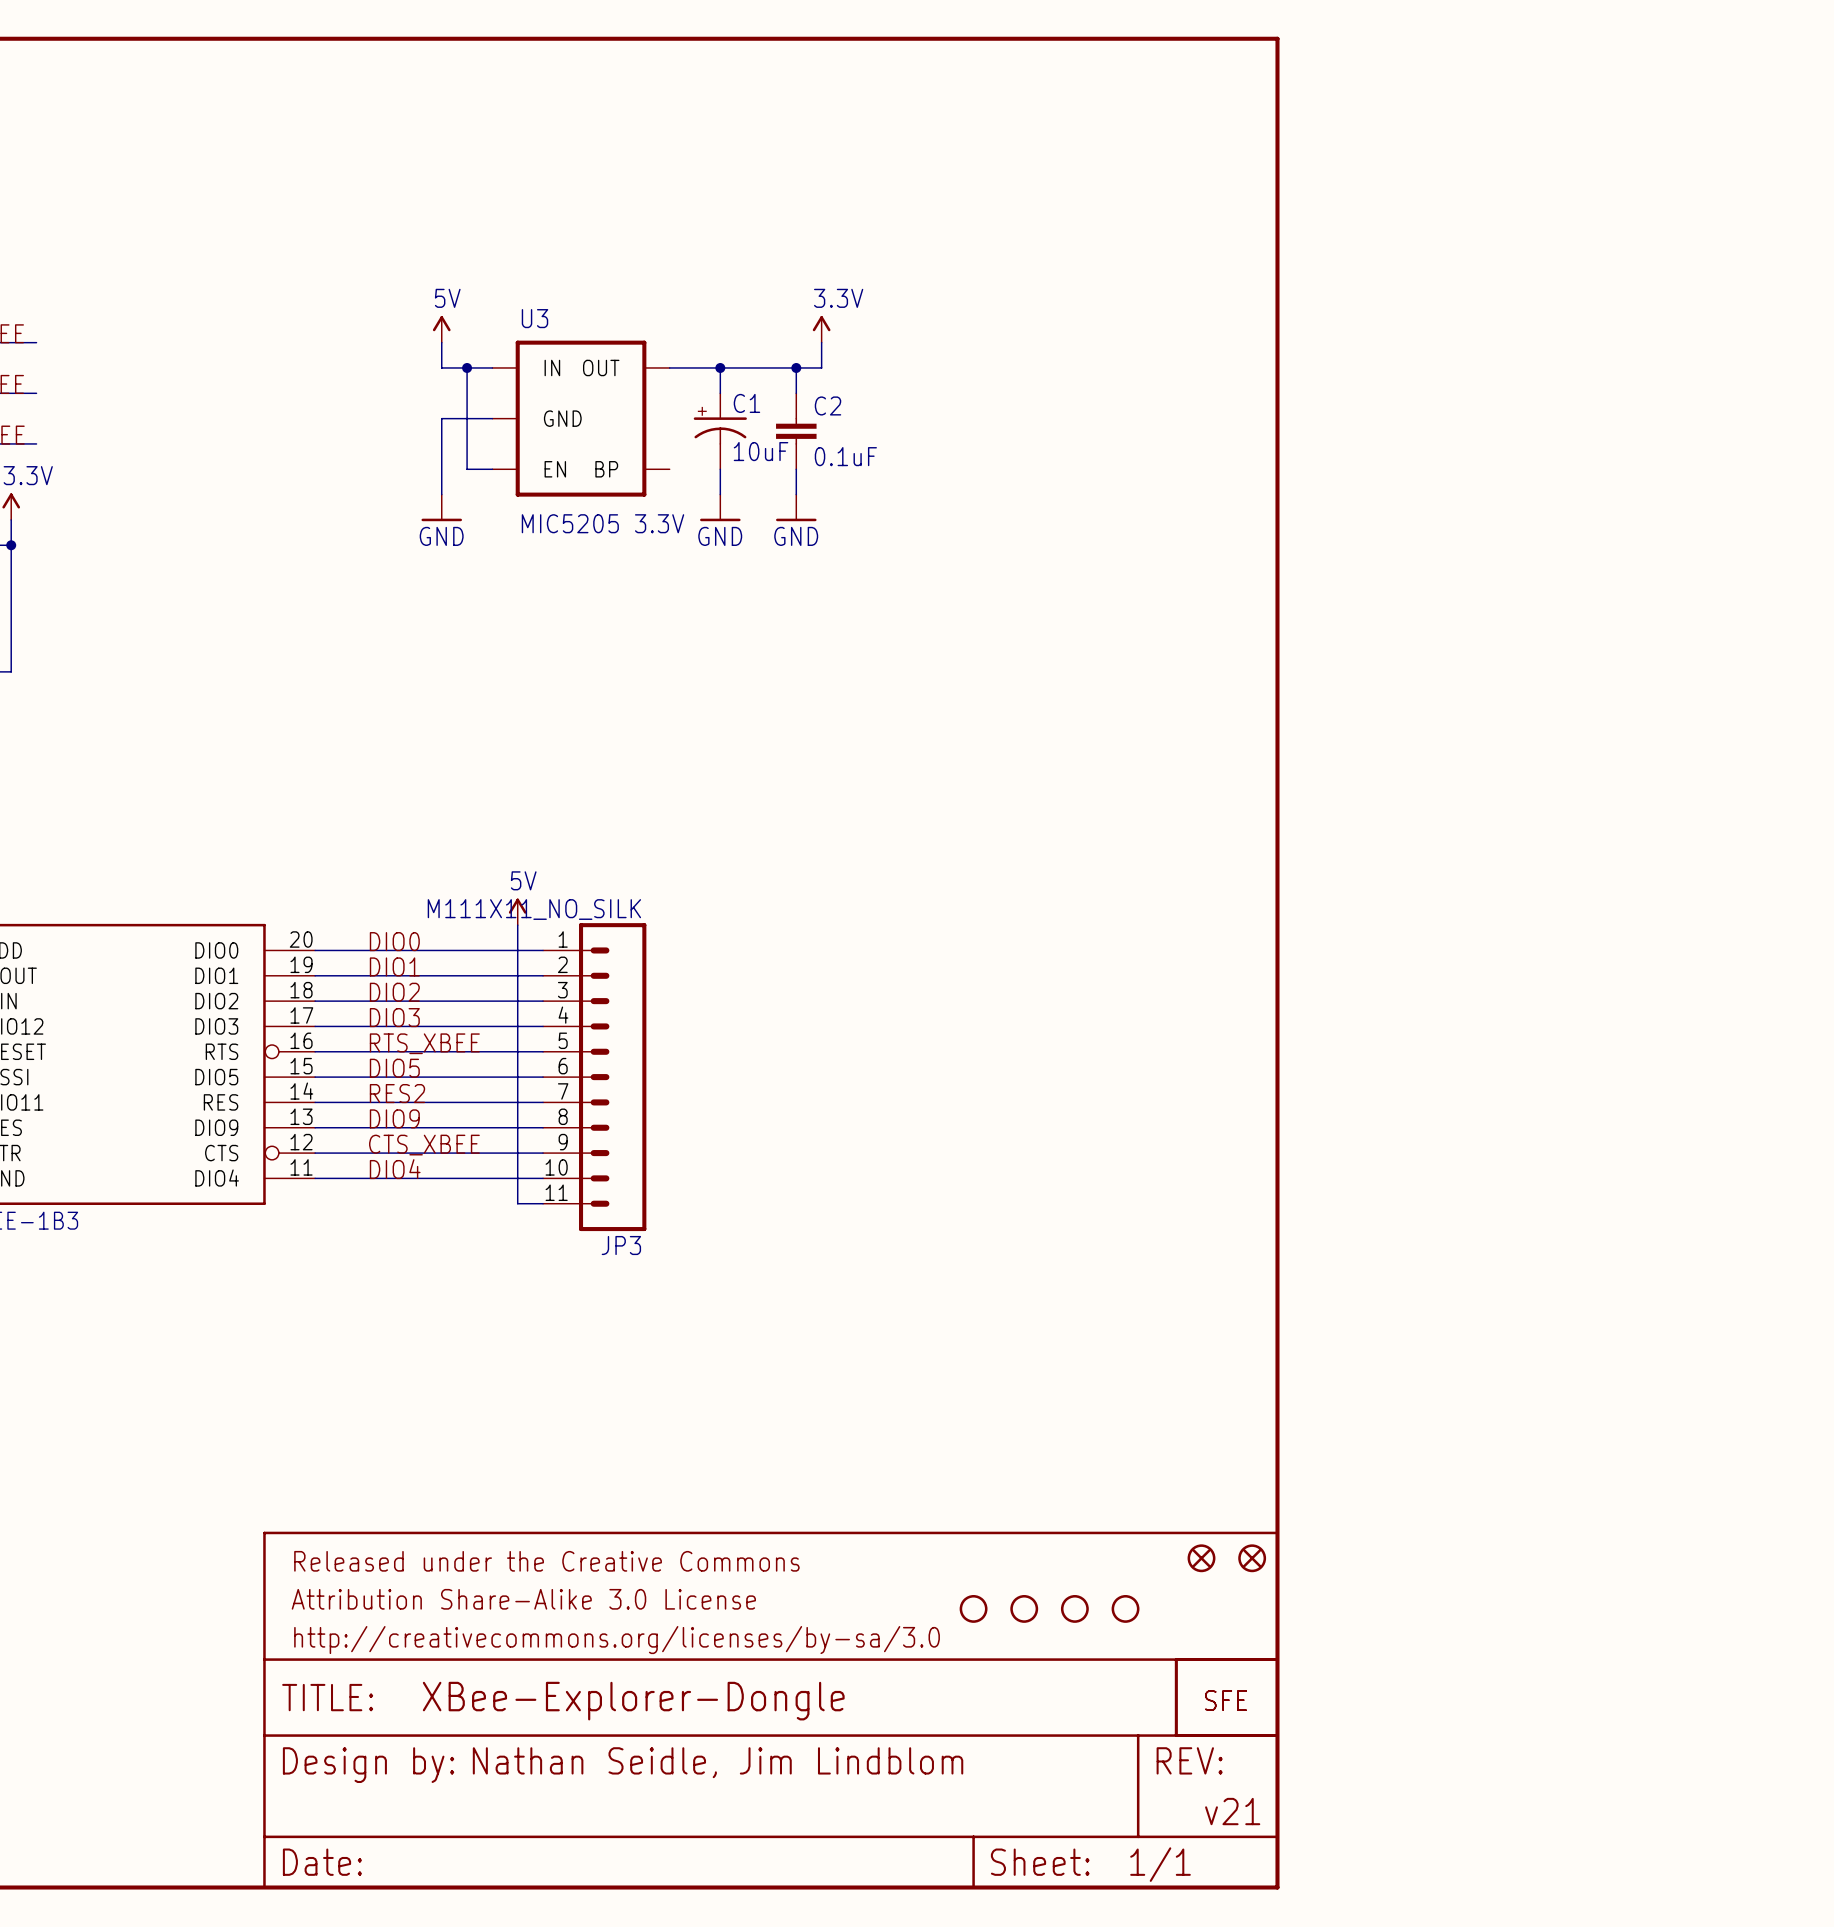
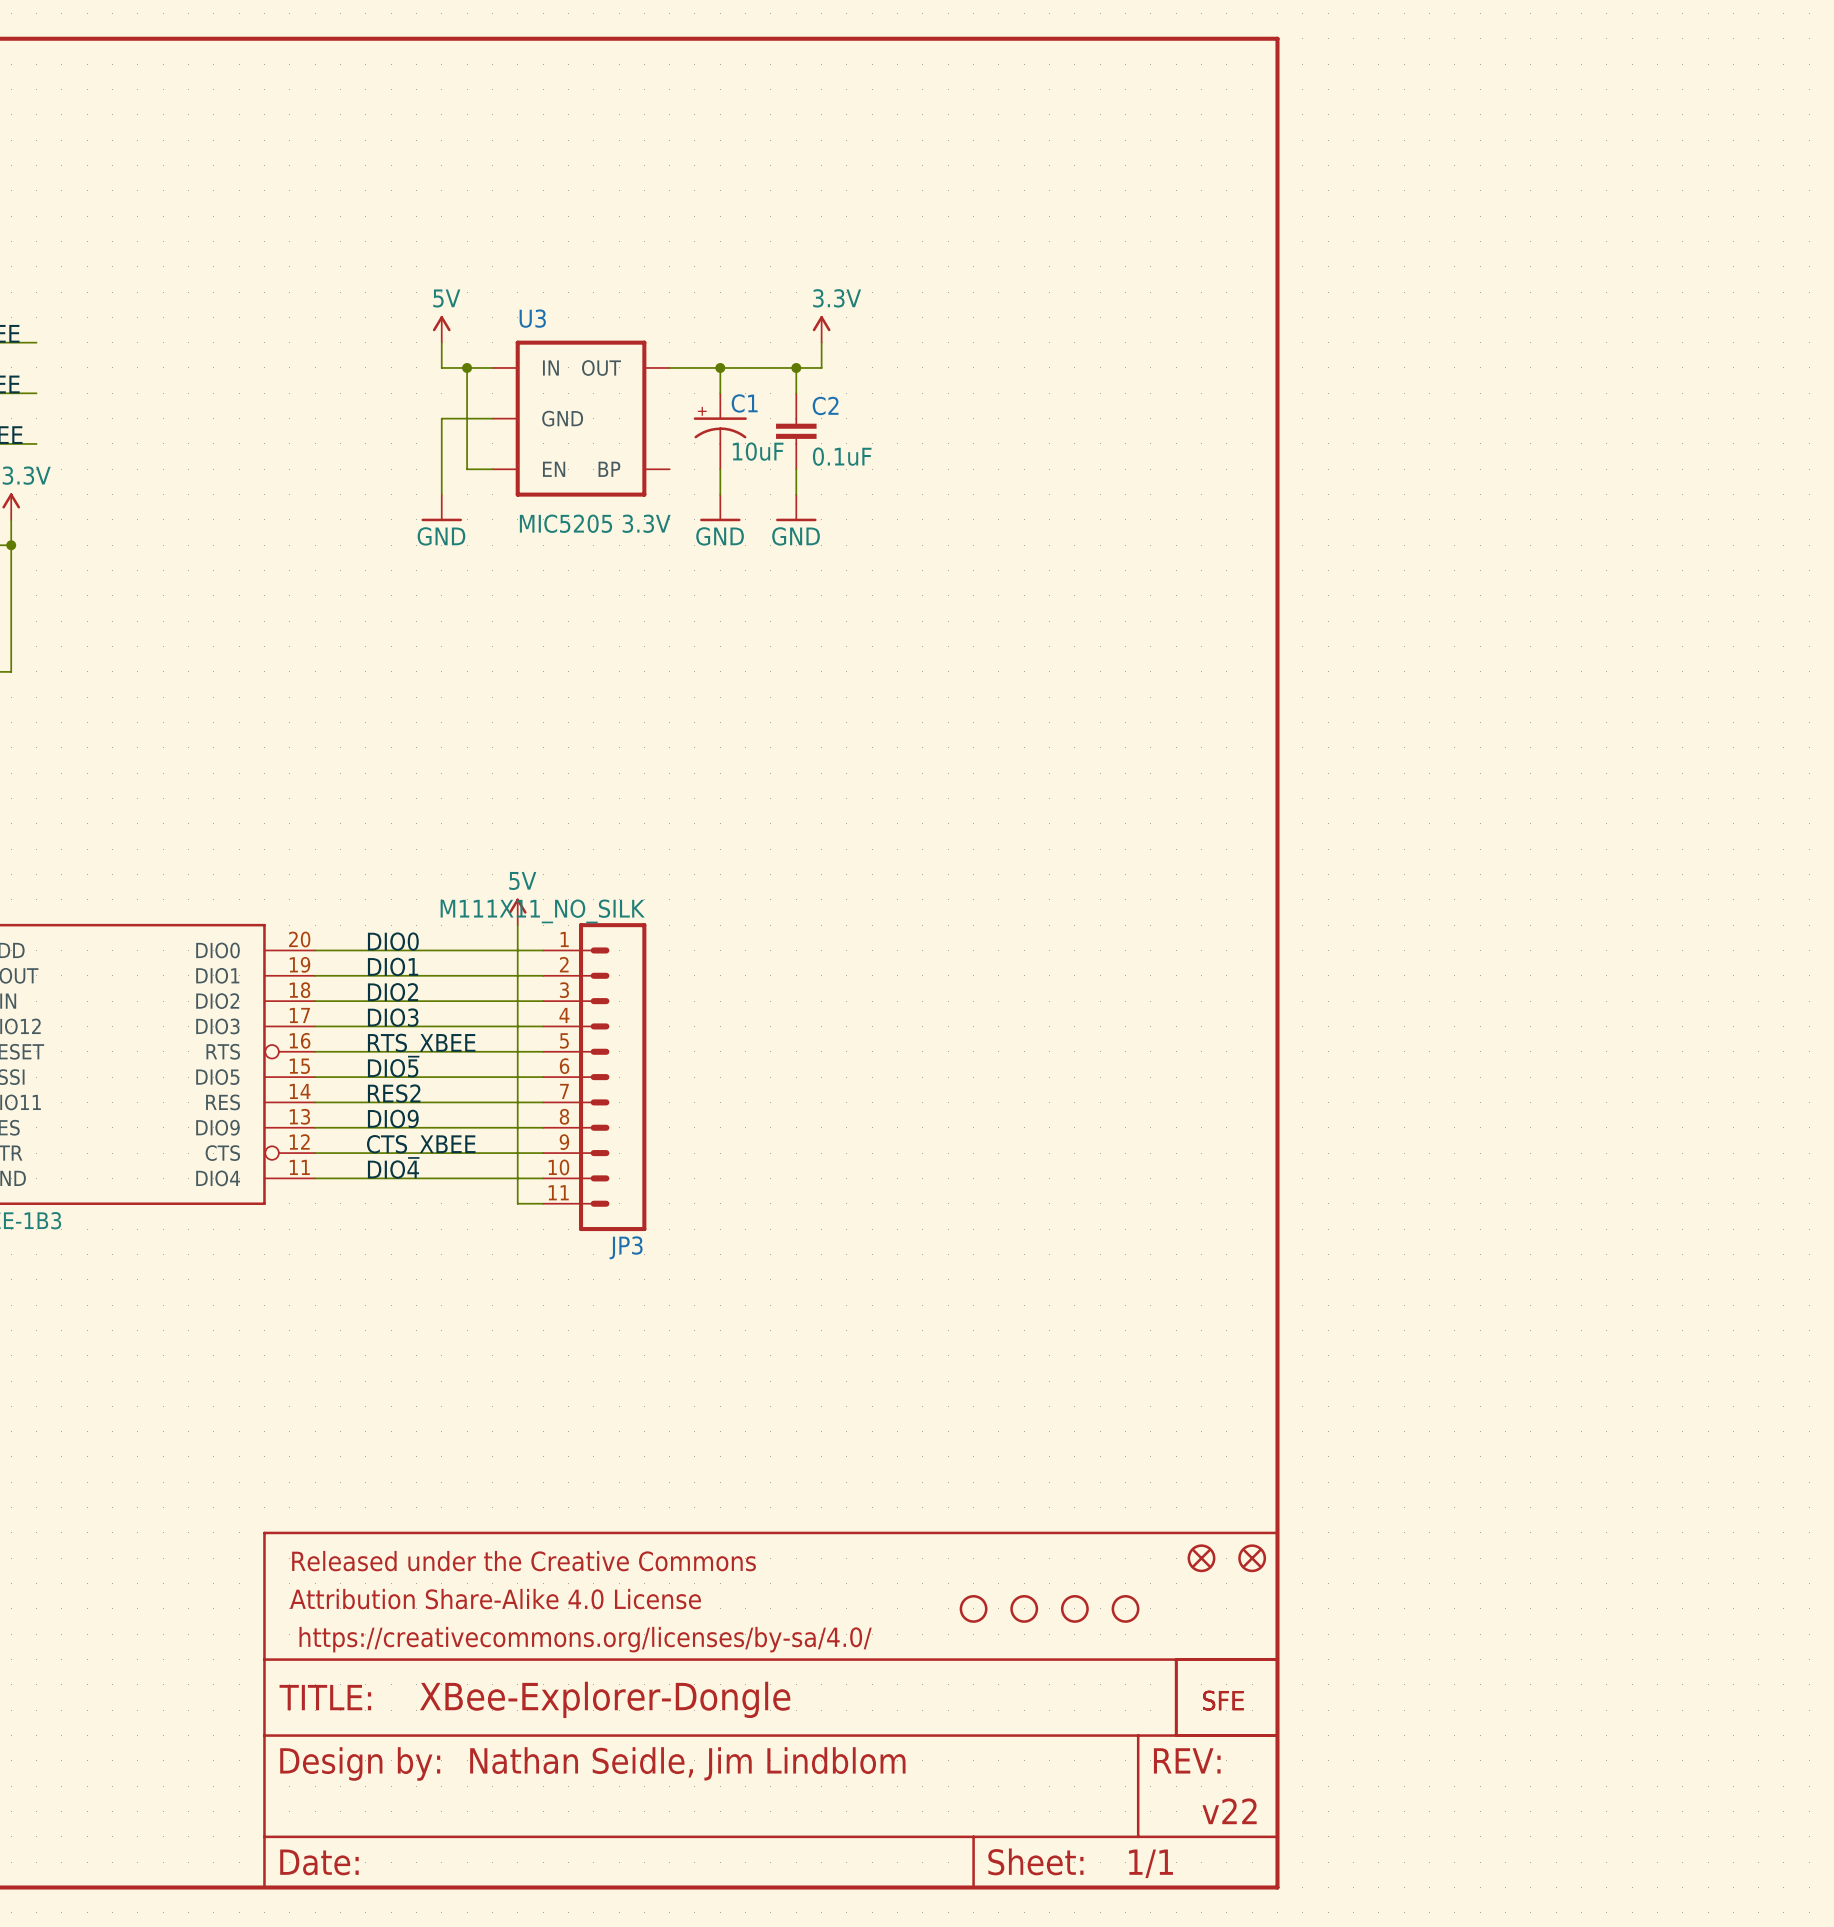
part text: Attribution Share-Alike 3.0 License (523, 1599) -> Attribution Share-Alike 4.0 License (495, 1599)
part text: http://creativecommons.org/licenses/by-sa/3.0 (617, 1640) -> https://creativecommons.org/licenses/by-sa/4.0/ (585, 1639)
text: v21 (1232, 1811) -> v22 (1229, 1811)

